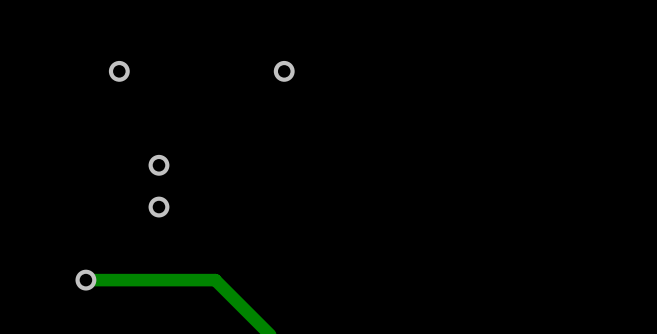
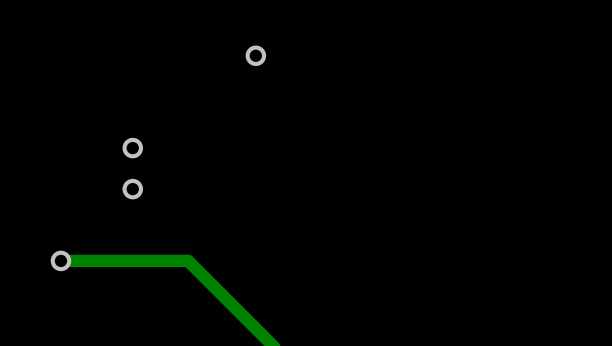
via: (119, 71) -> none

